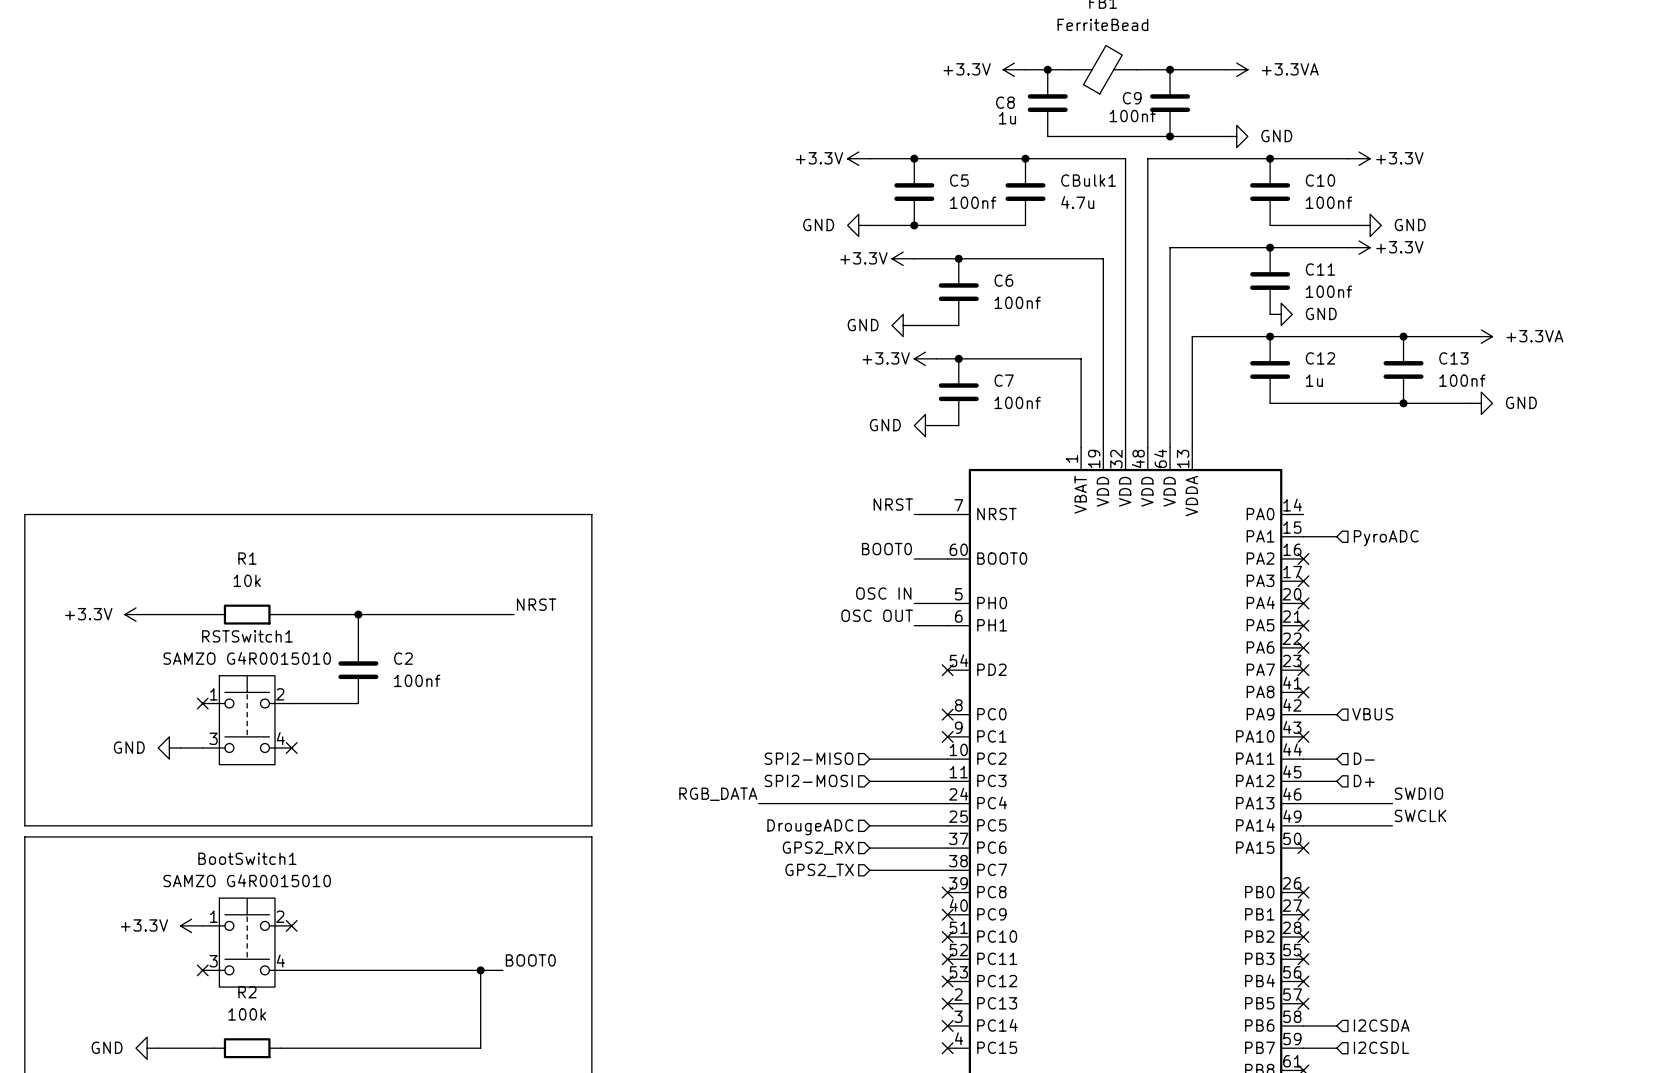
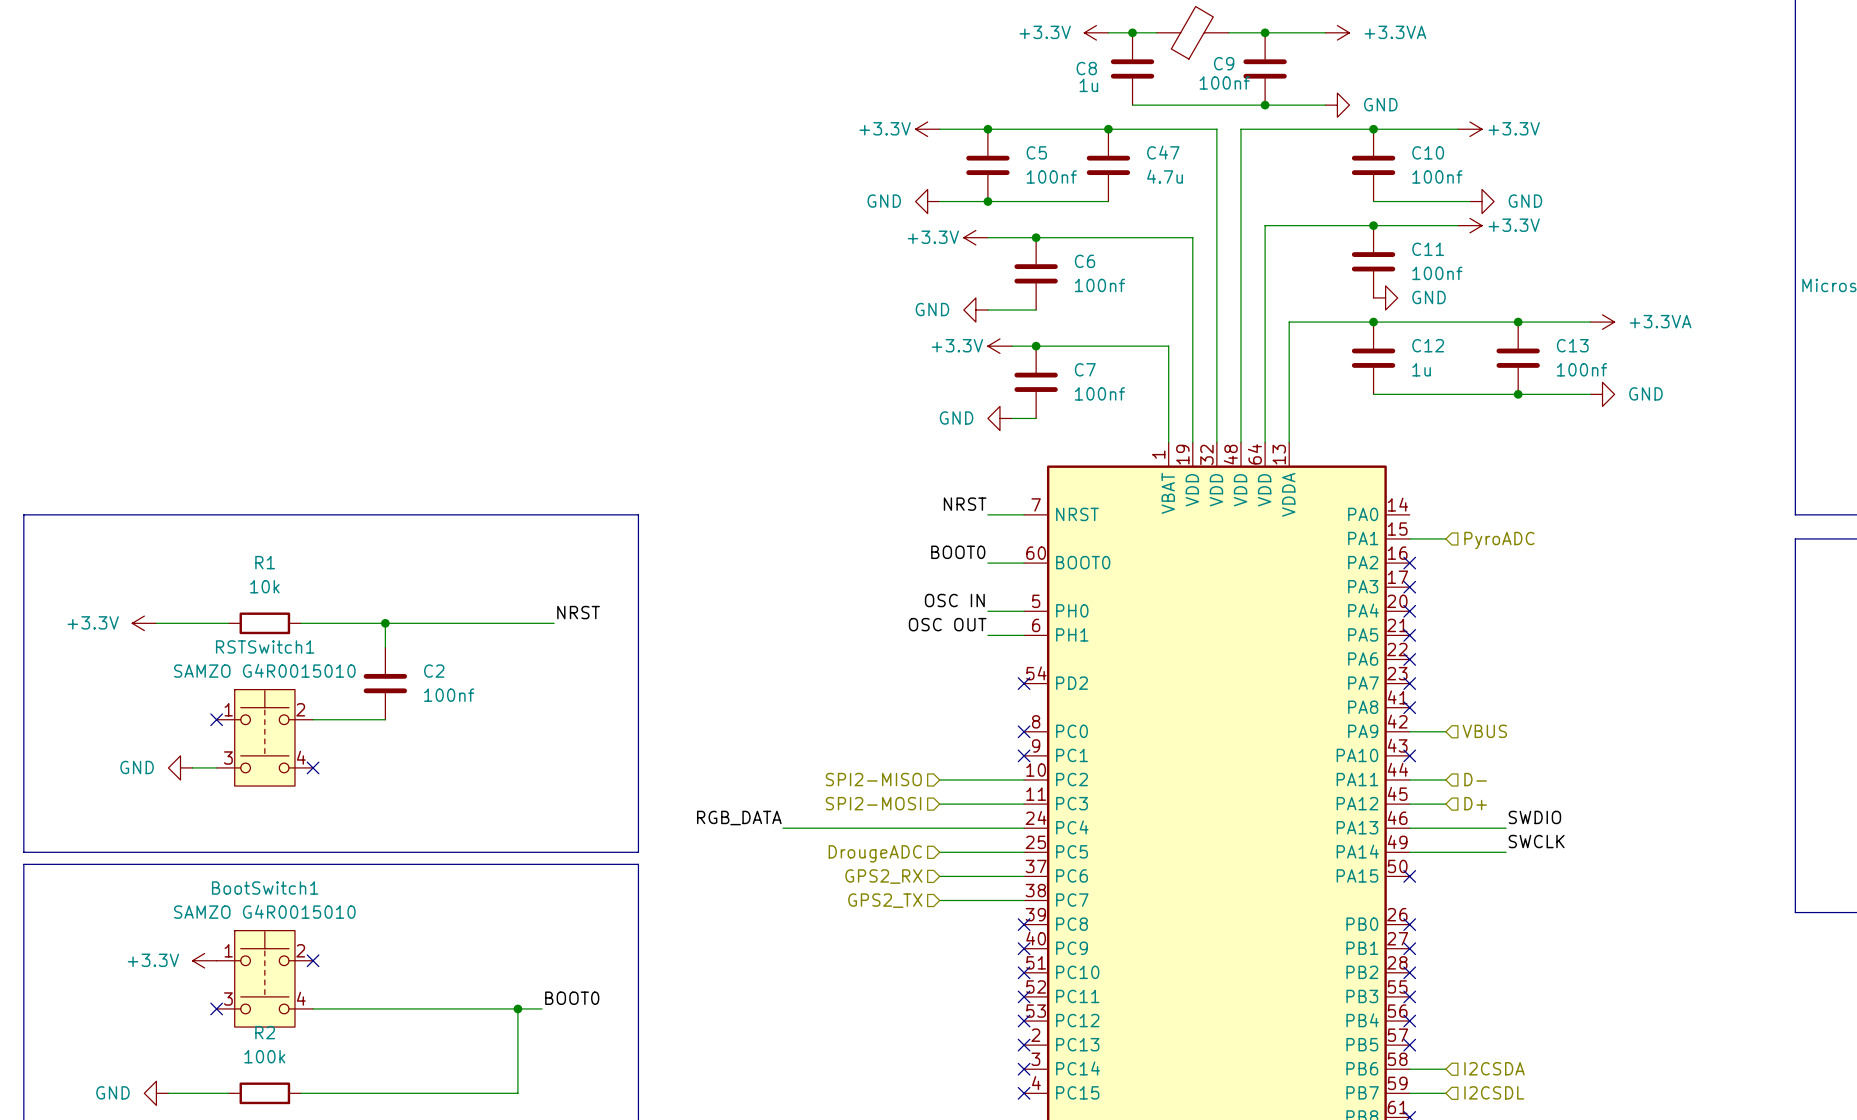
CBulk1 name: CBulk1 (1088, 180) -> C47 (1163, 152)
label position: RGB_DATA (718, 794) -> RGB_DATA (739, 818)
wire: none -> (783, 828) (819, 828)

